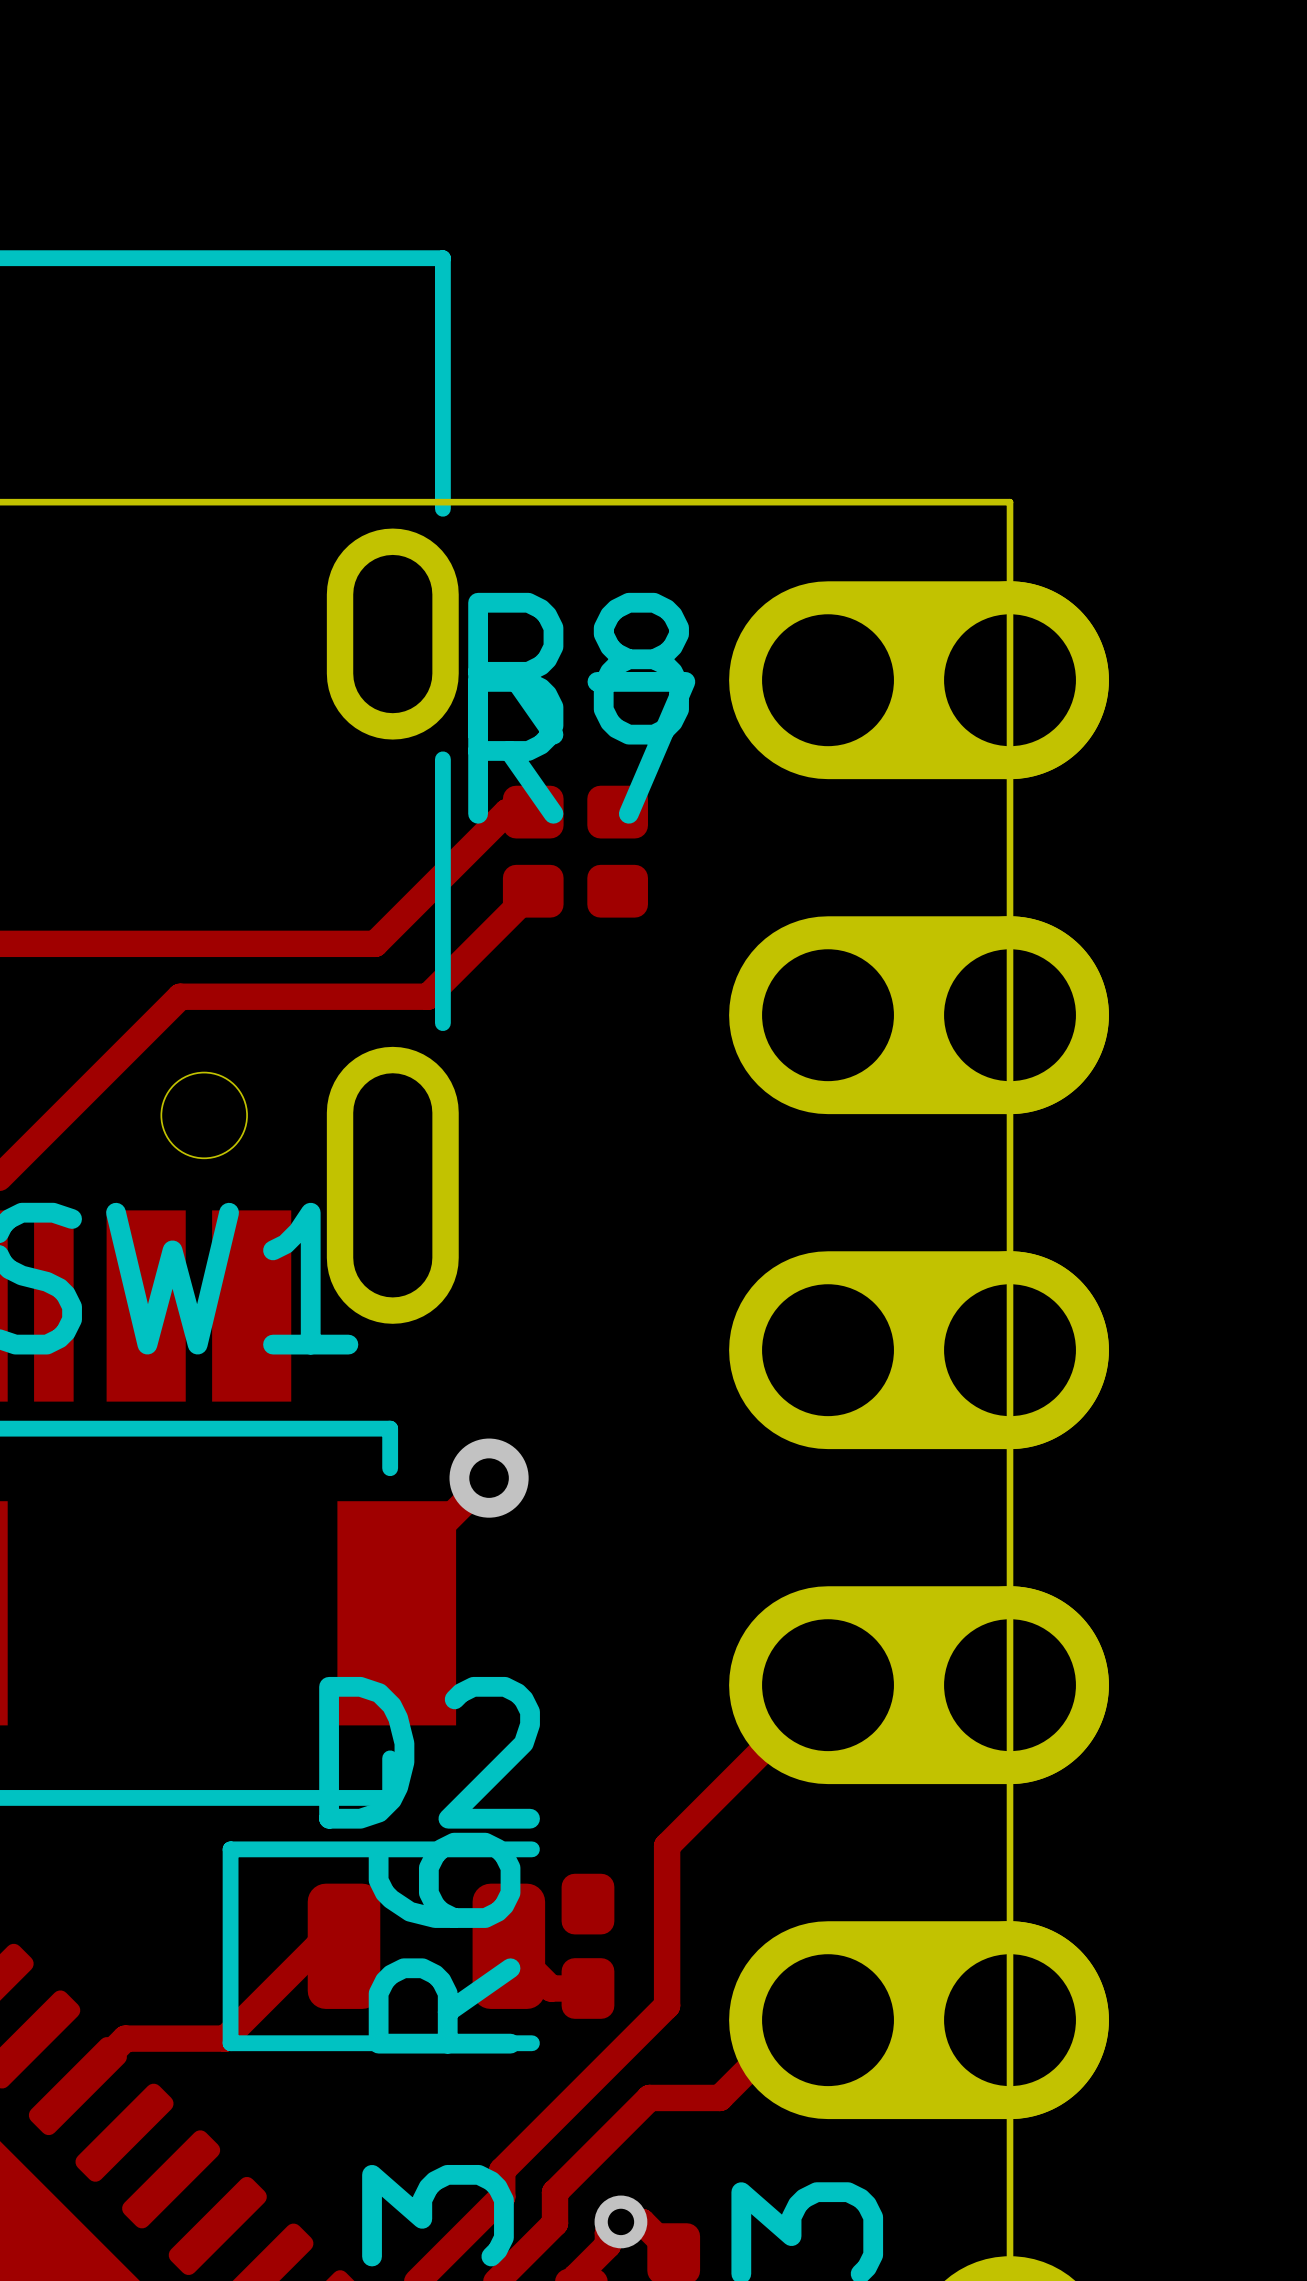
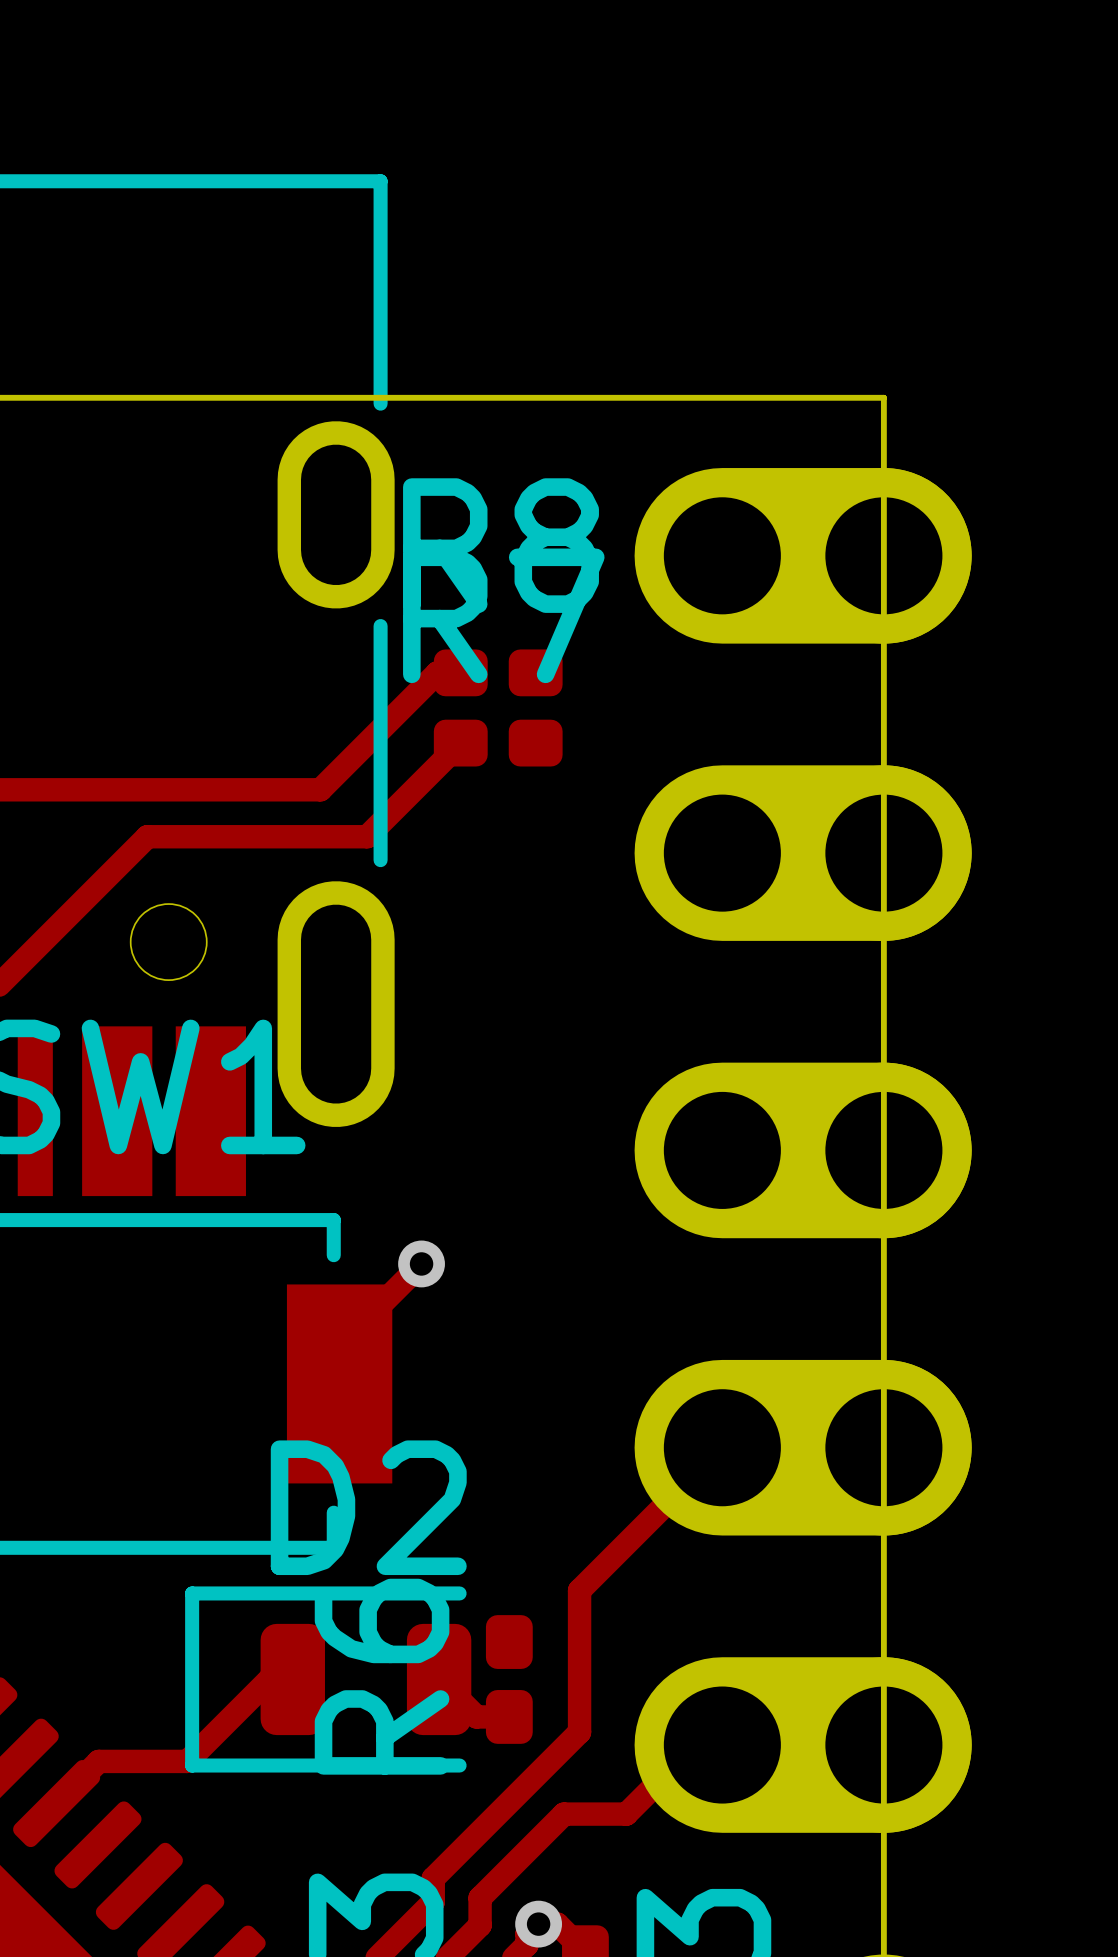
via size: [449, 1438, 529, 1518] -> [398, 1240, 445, 1288]

